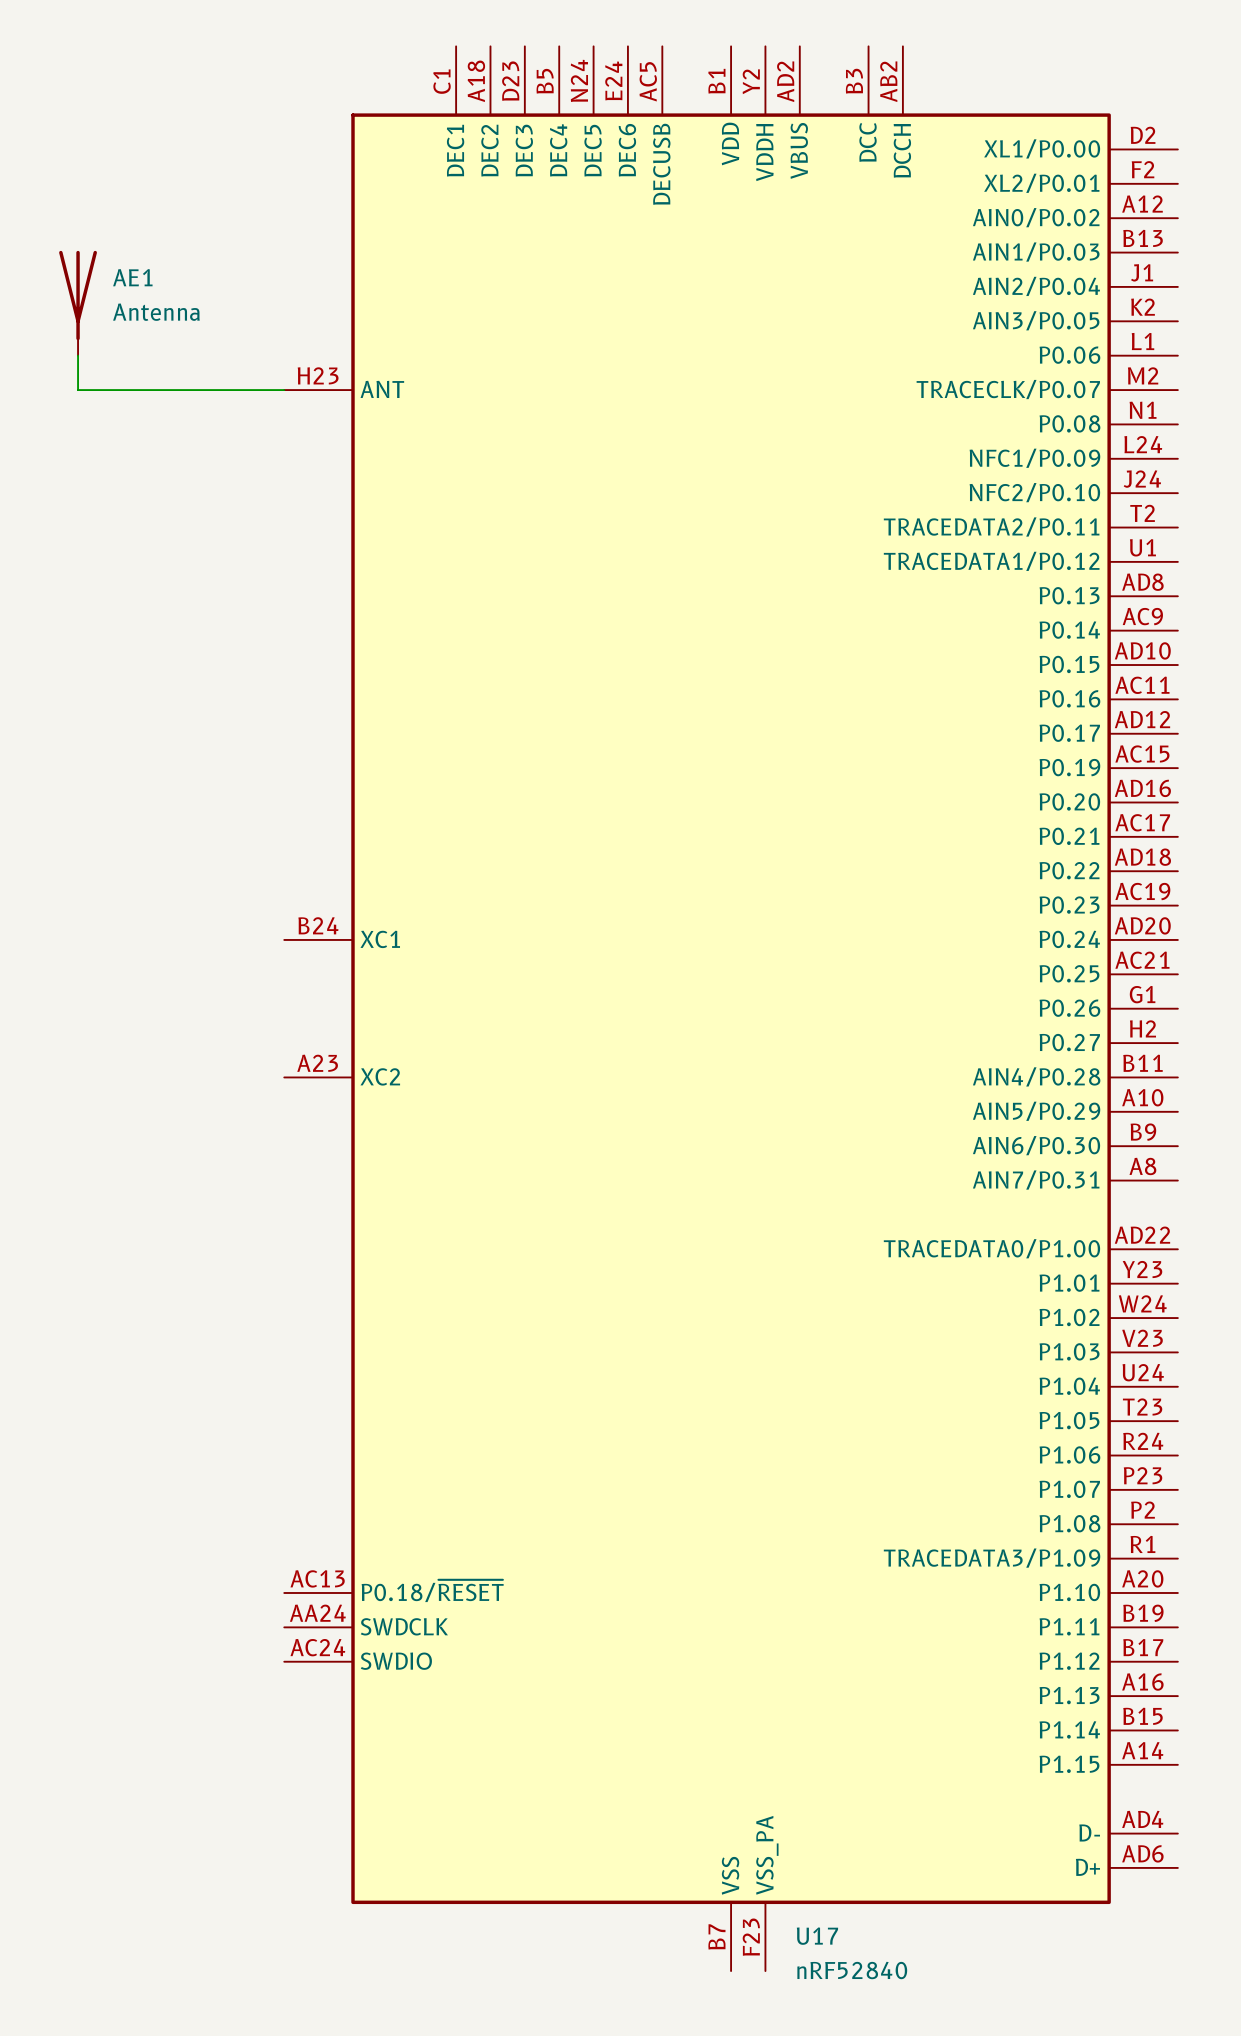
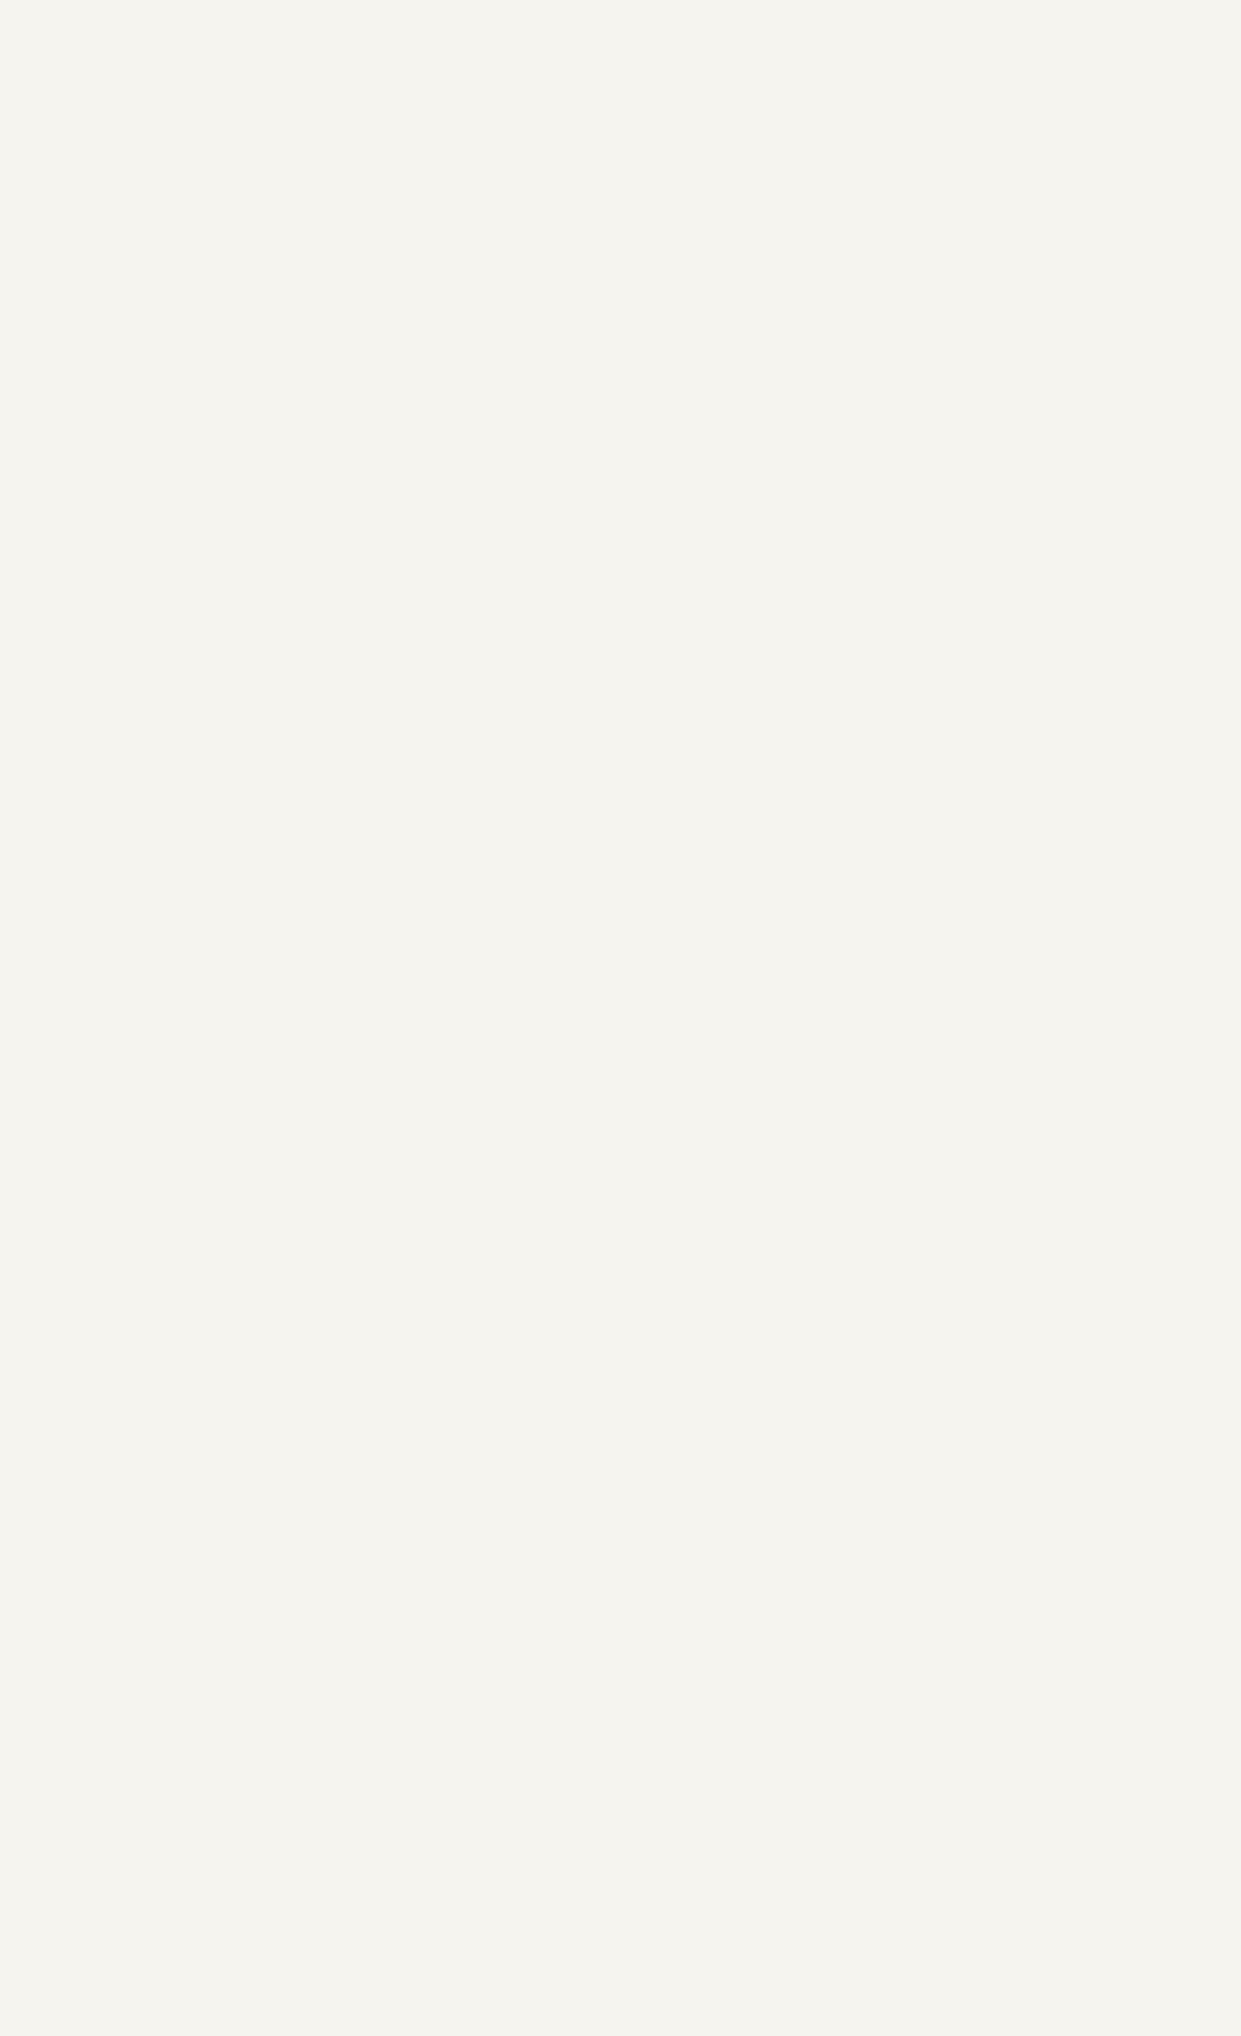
AE1: Antenna (78, 303) -> none
wire: (78, 355) (78, 390) (284, 390) -> none
U17: nRF52840 (731, 1008) -> none

